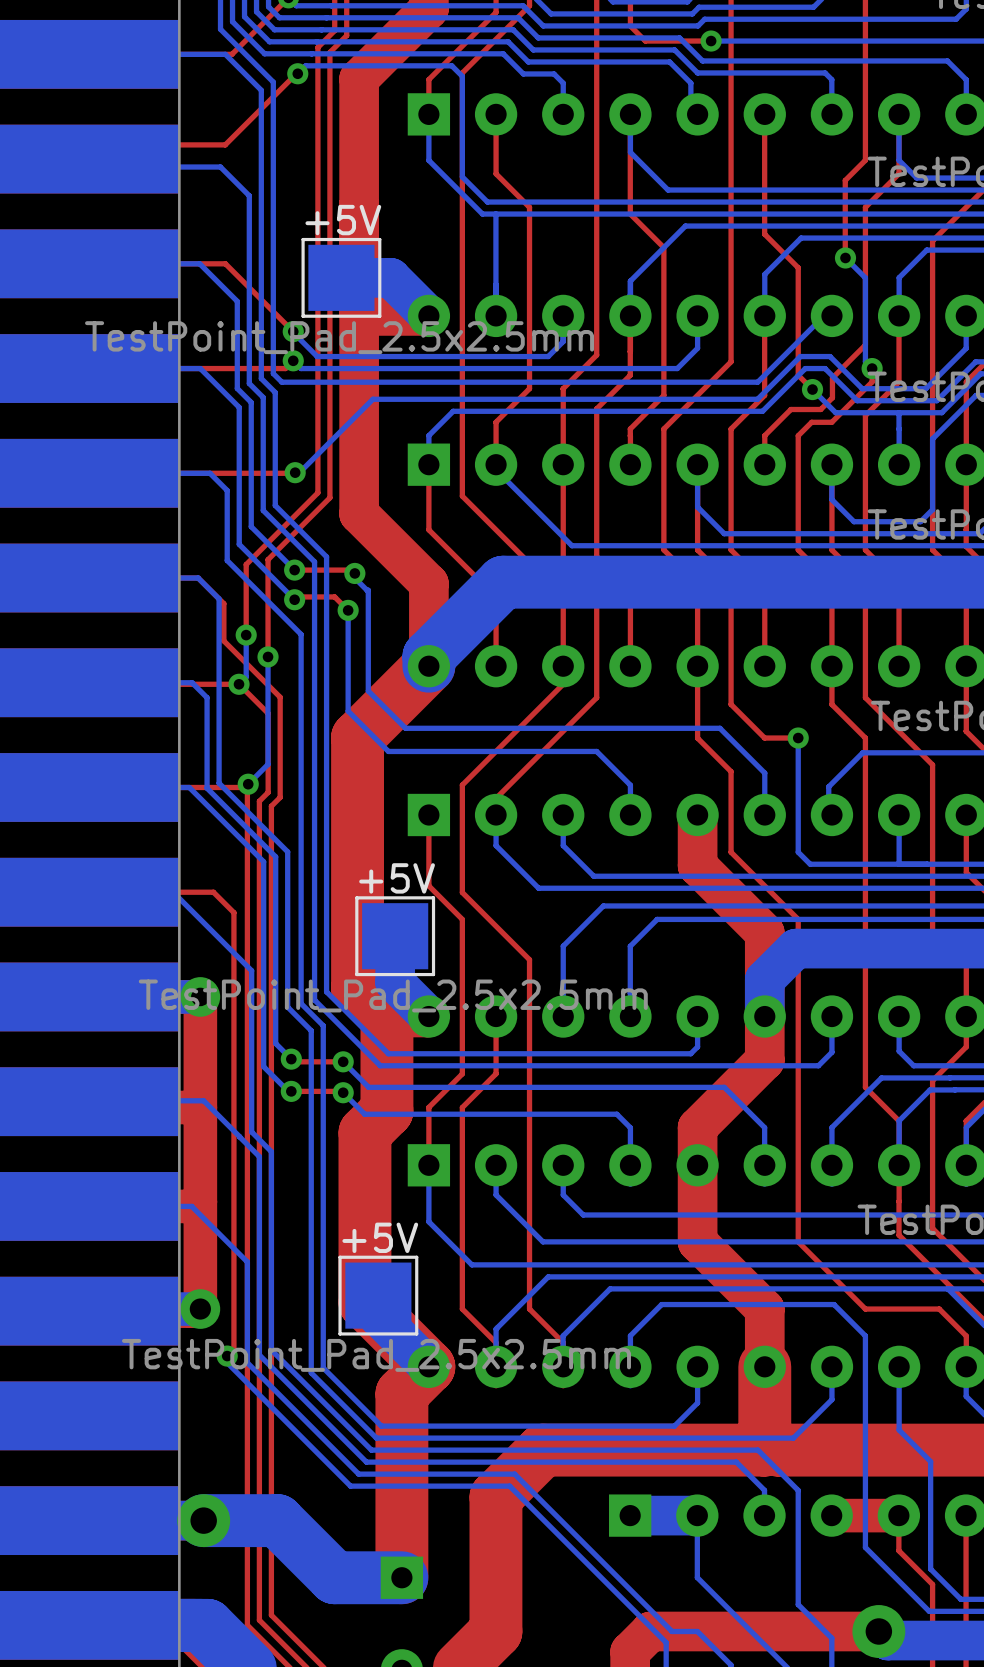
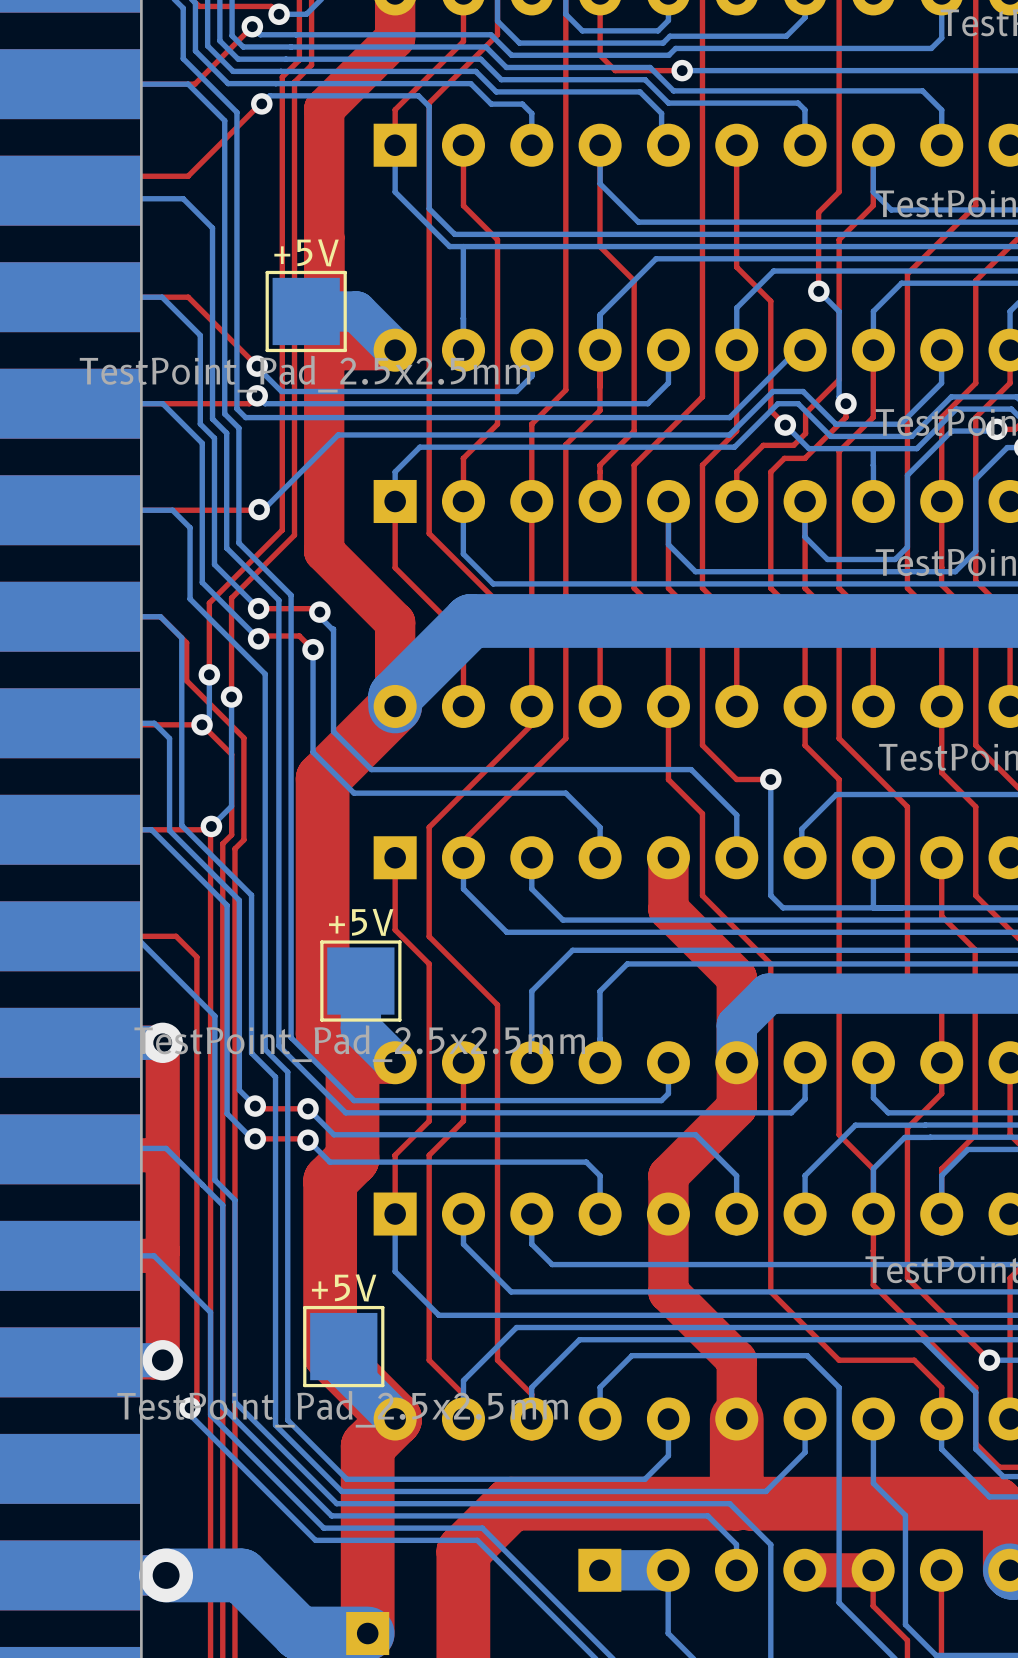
bottom track: (495, 469) (571, 545) -> (463, 506) (463, 554) (493, 583) (540, 583)

